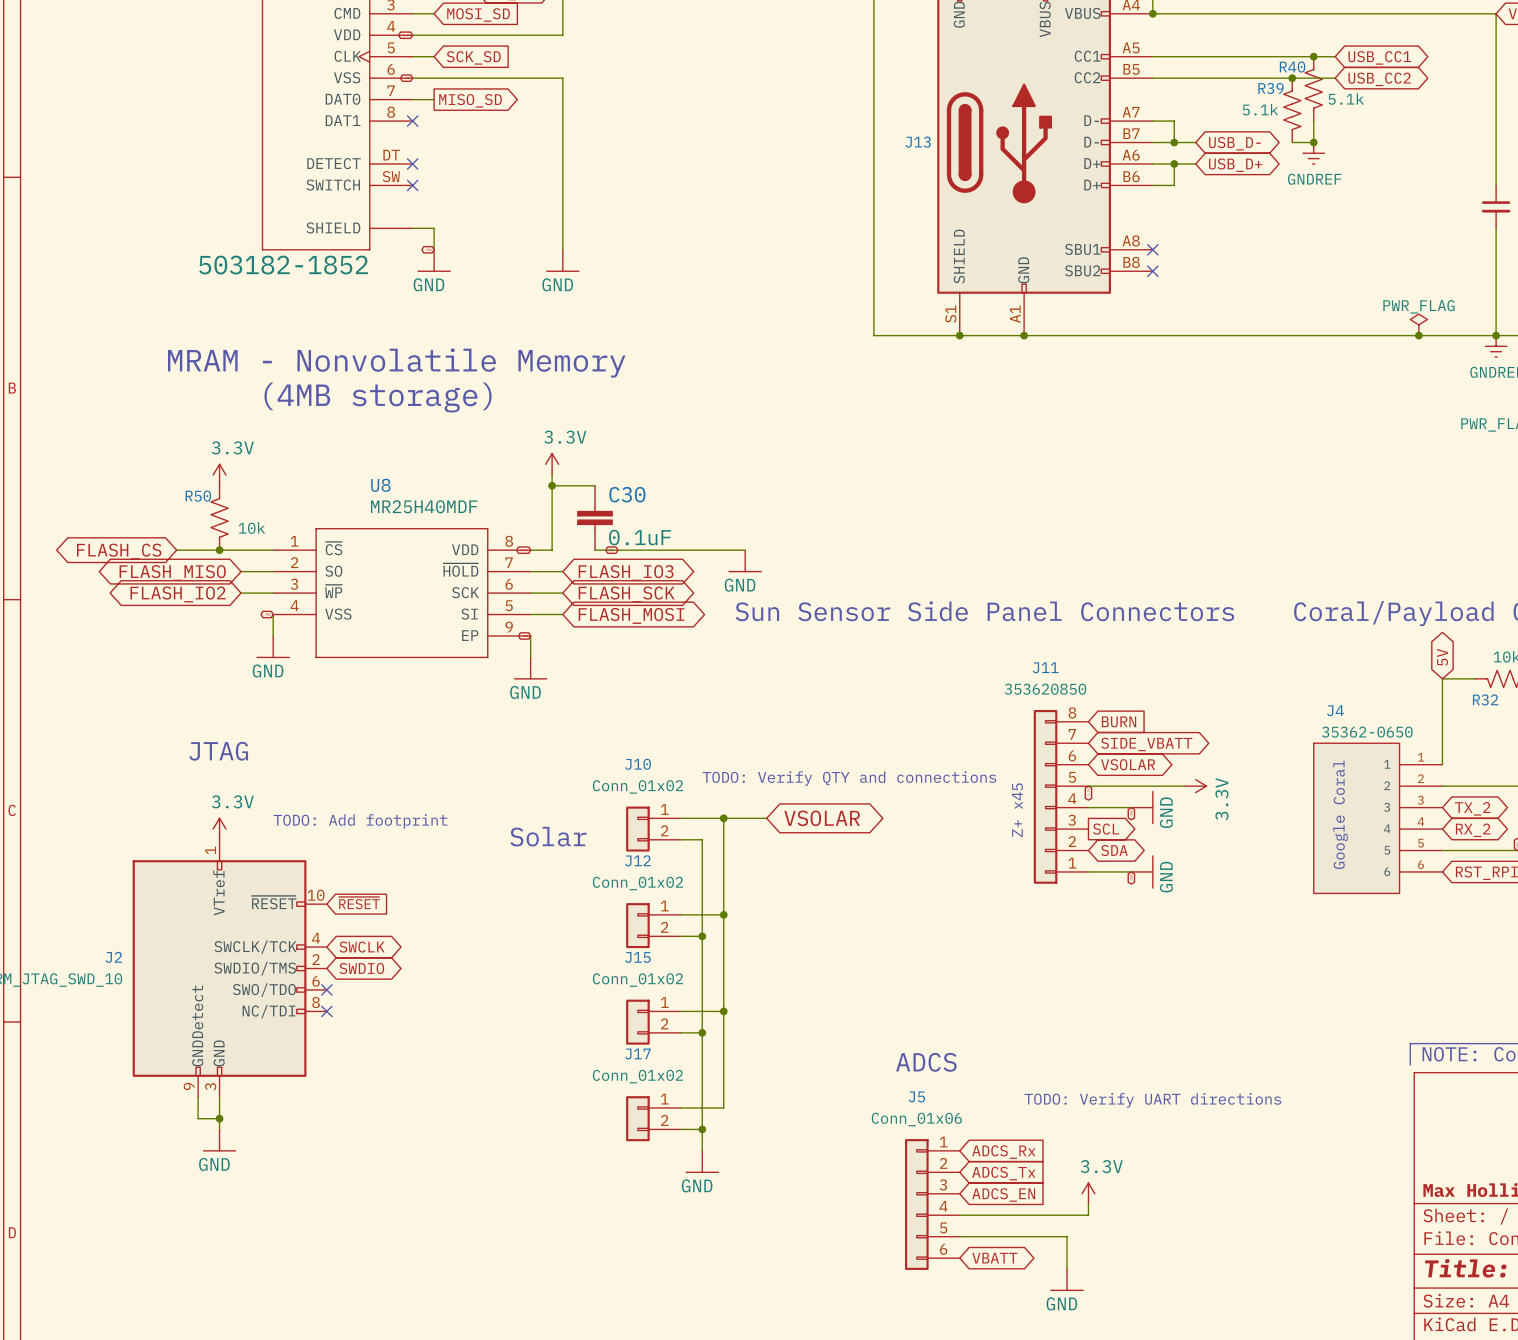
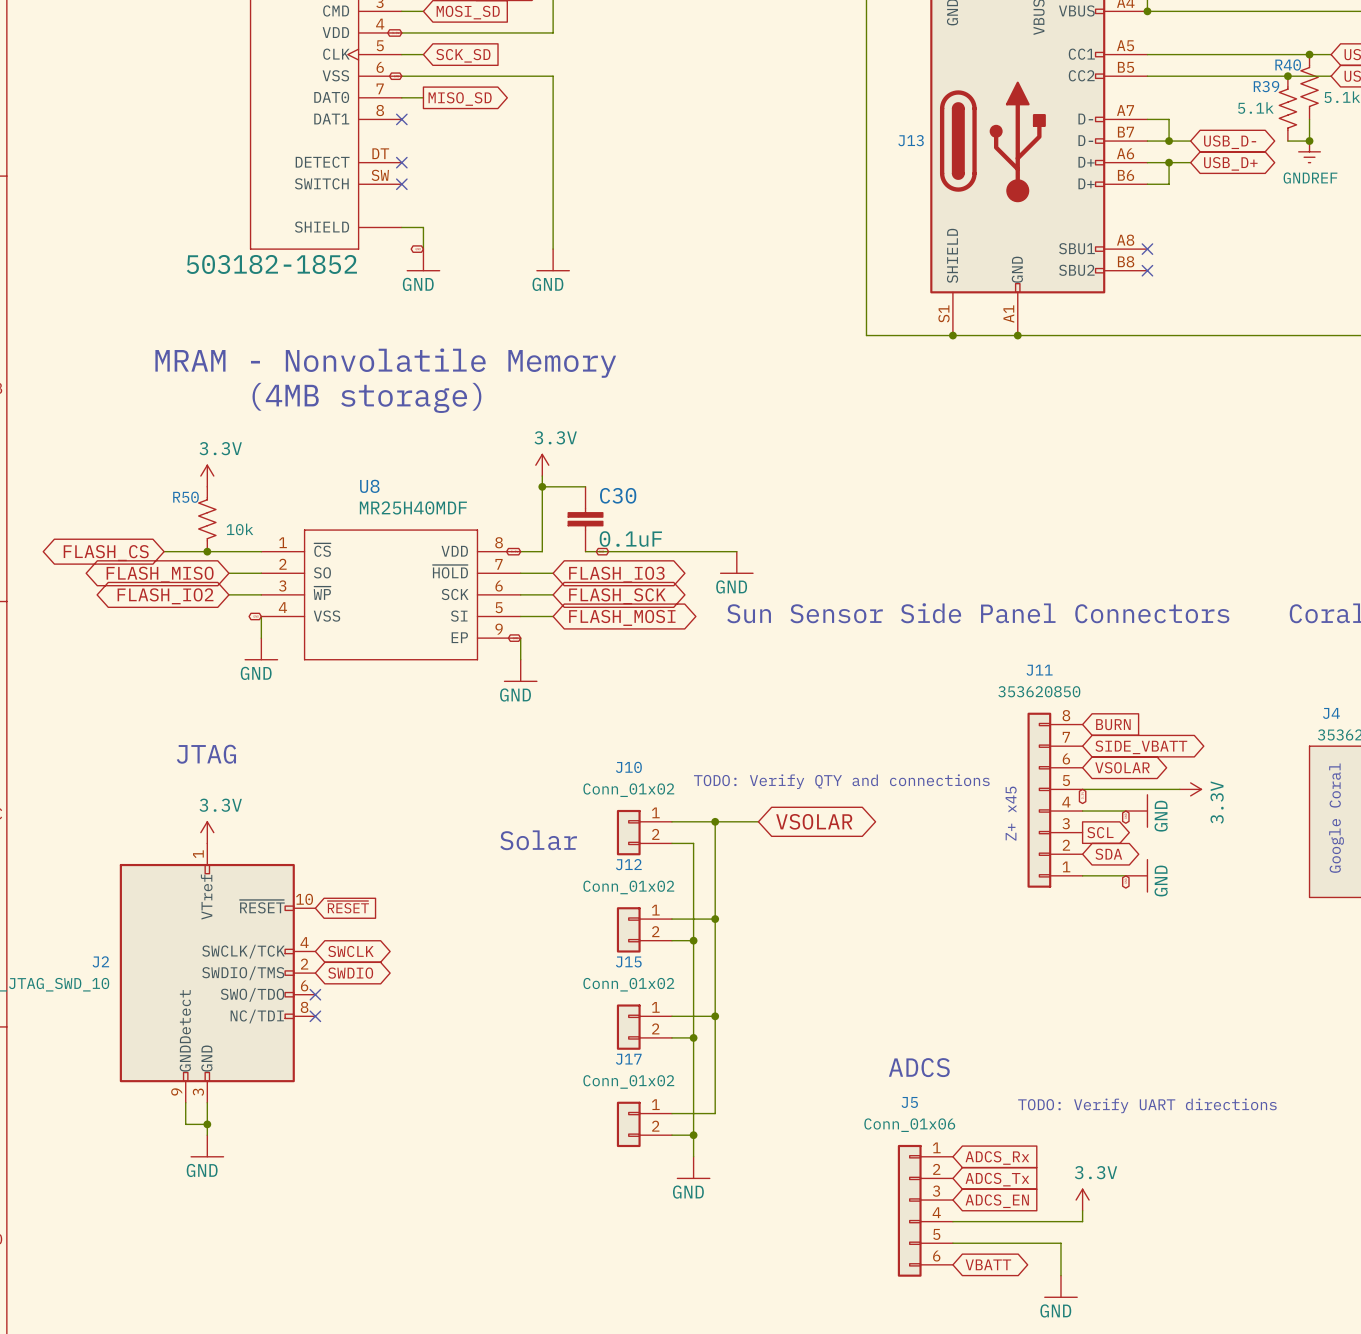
text: TODO: Add footprint (360, 821) -> none

